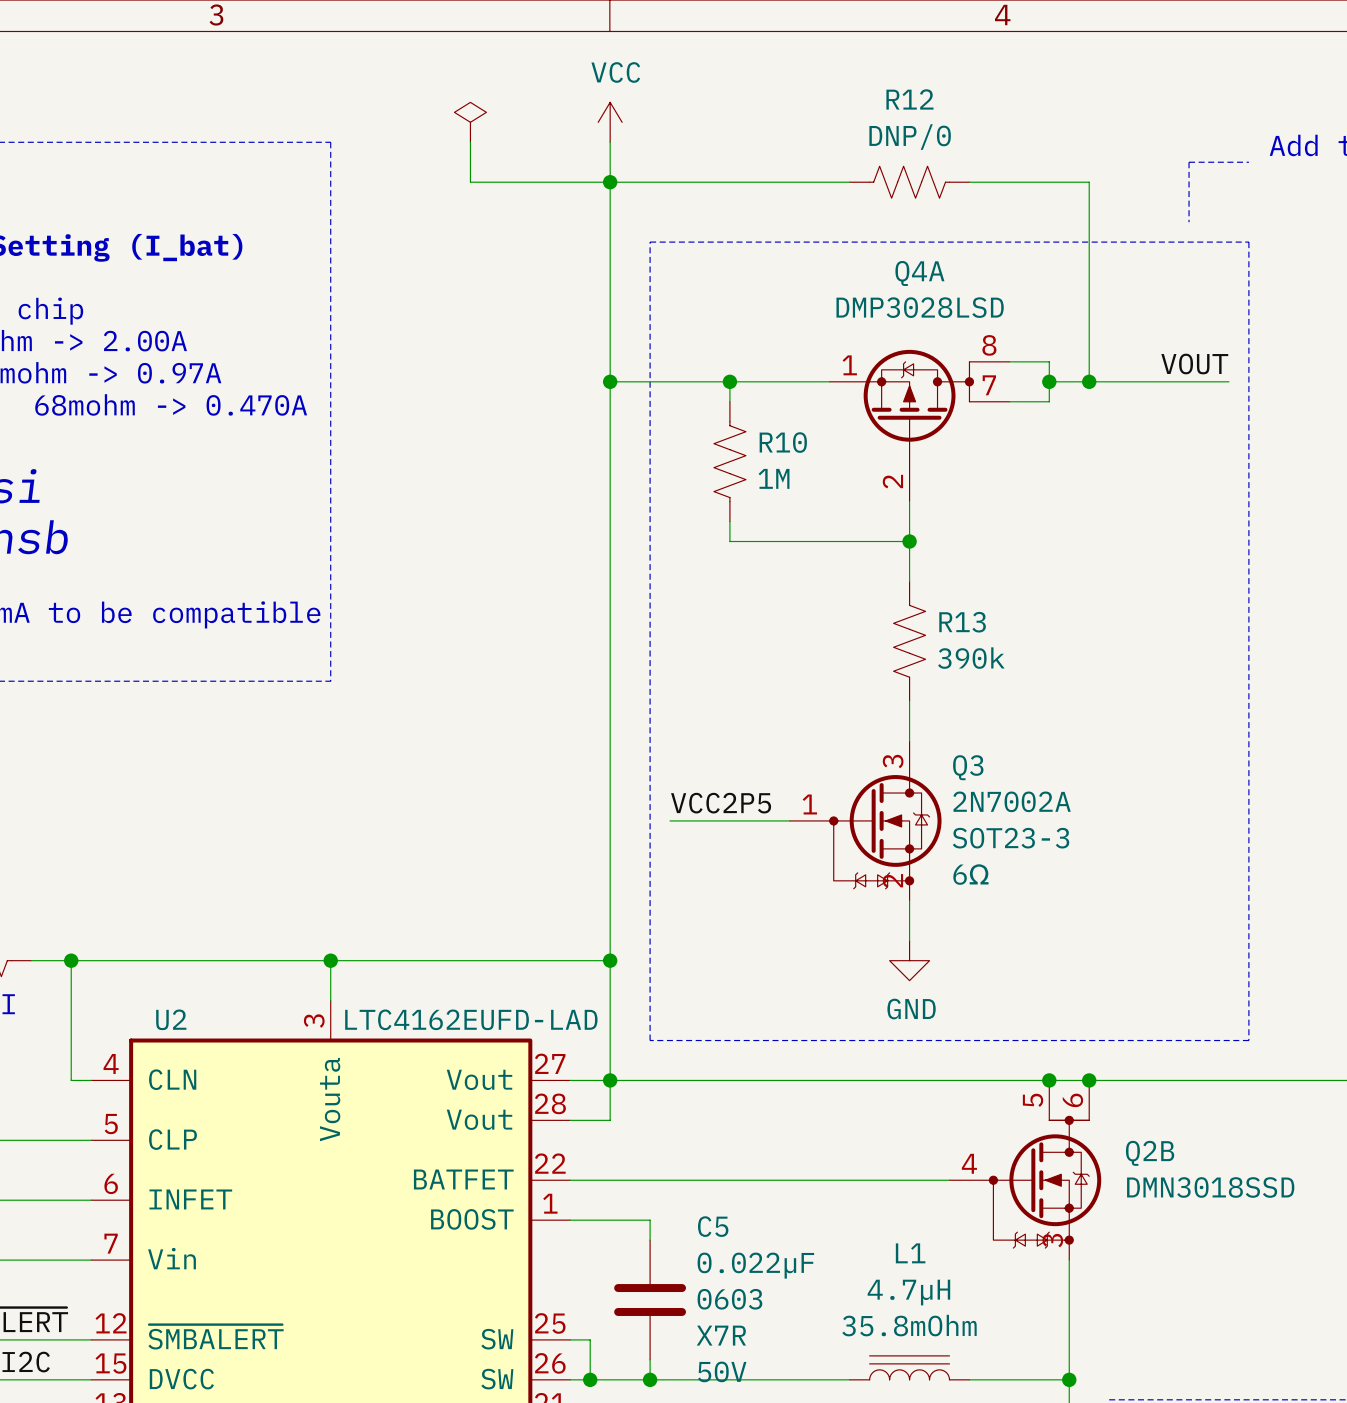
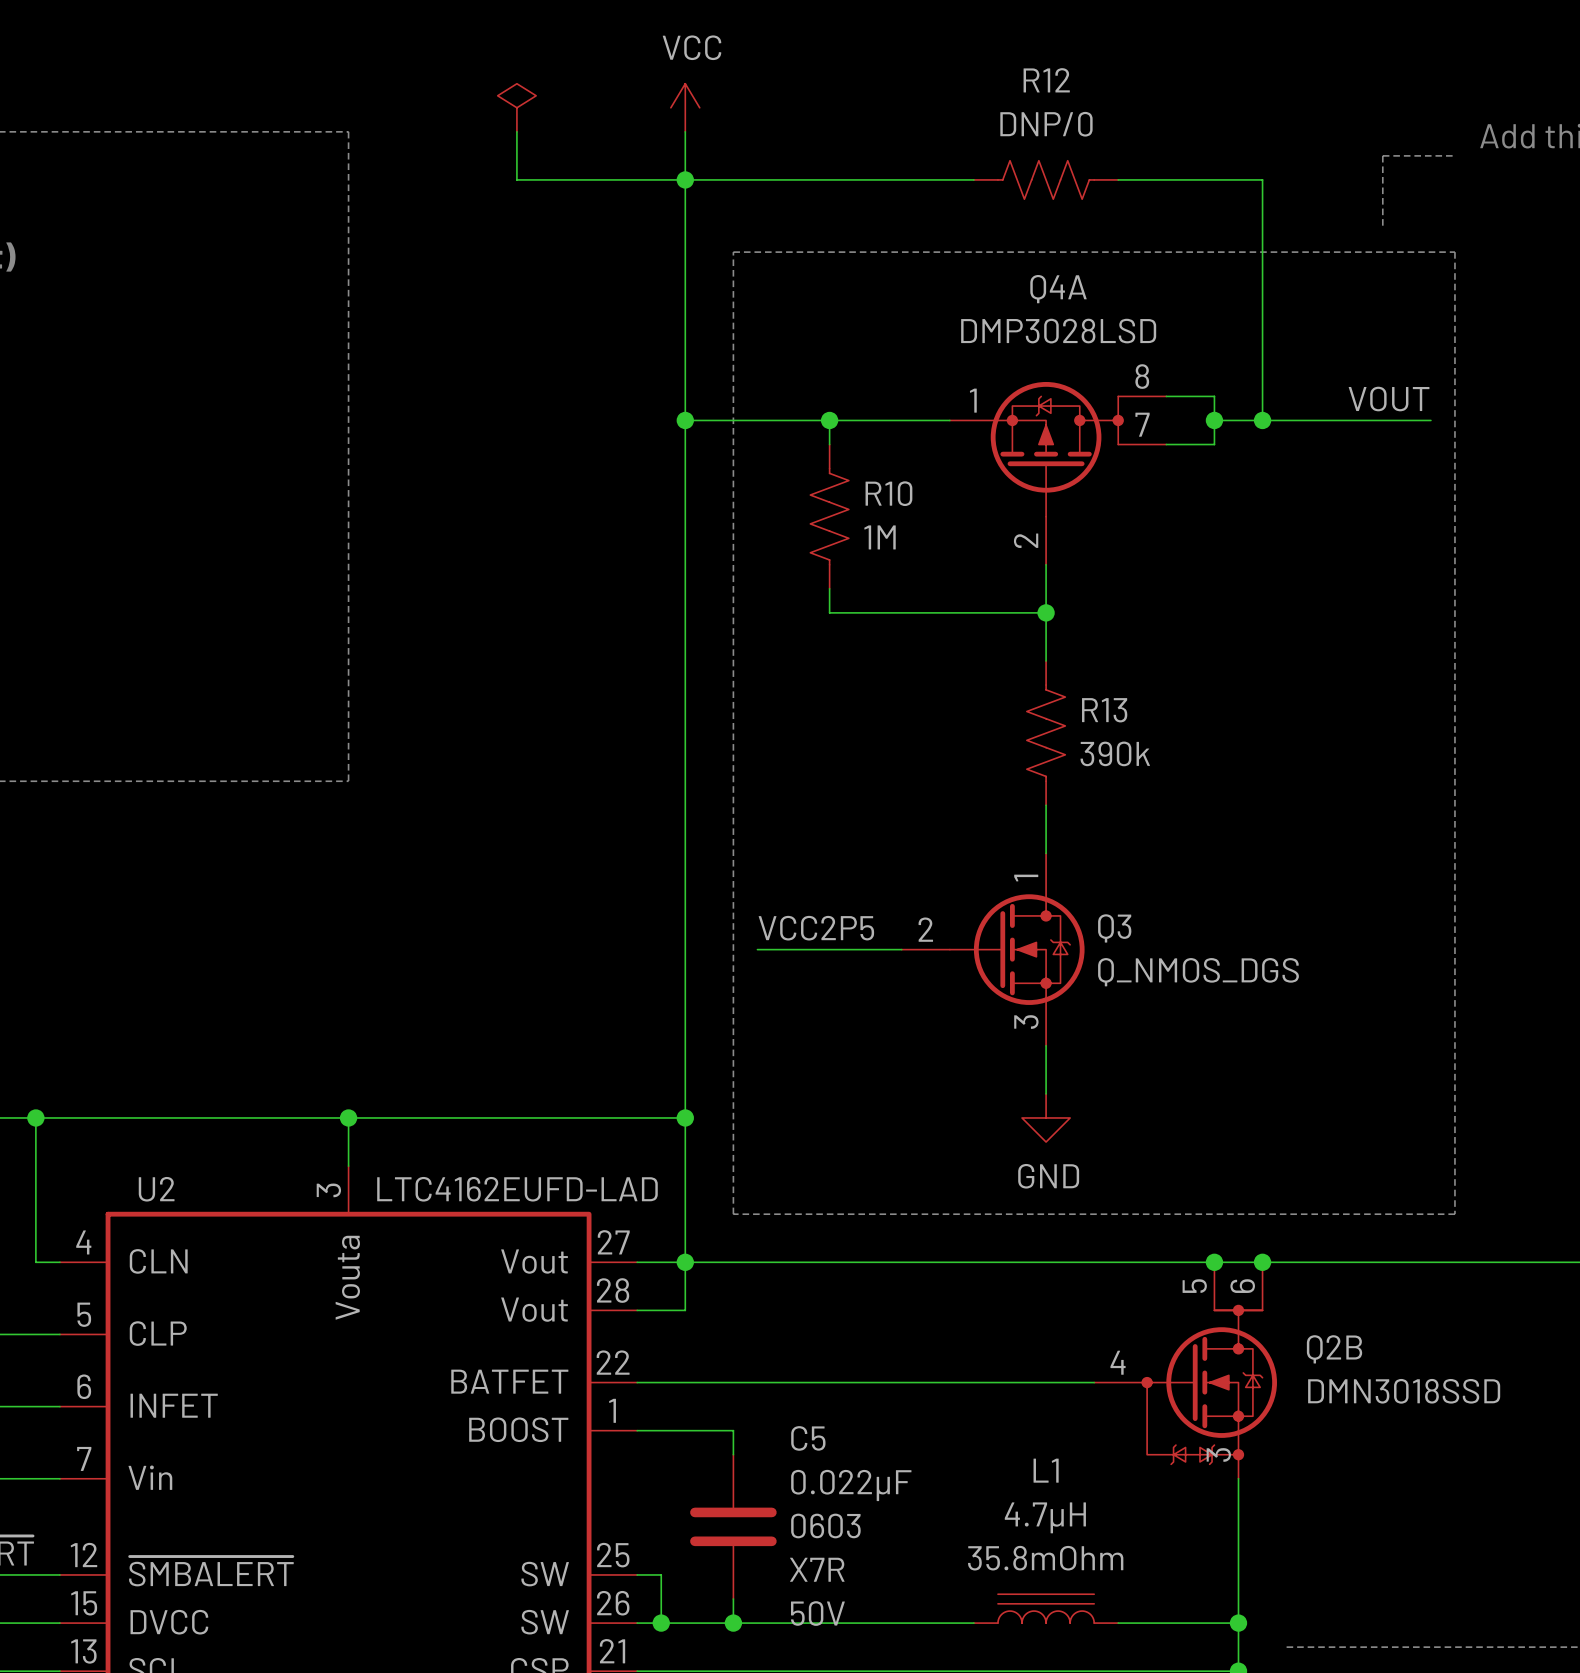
Q3 symbol: [789, 741, 942, 901] -> [901, 853, 1085, 1046]
Q3 name position: Q3 (968, 767) -> Q3 (1114, 928)
Q3 value: 2N7002A (1012, 801) -> Q_NMOS_DGS (1198, 972)
Q3 text: SOT23-3 (1011, 838) -> none
Q3 text: 6Ω (970, 874) -> none

